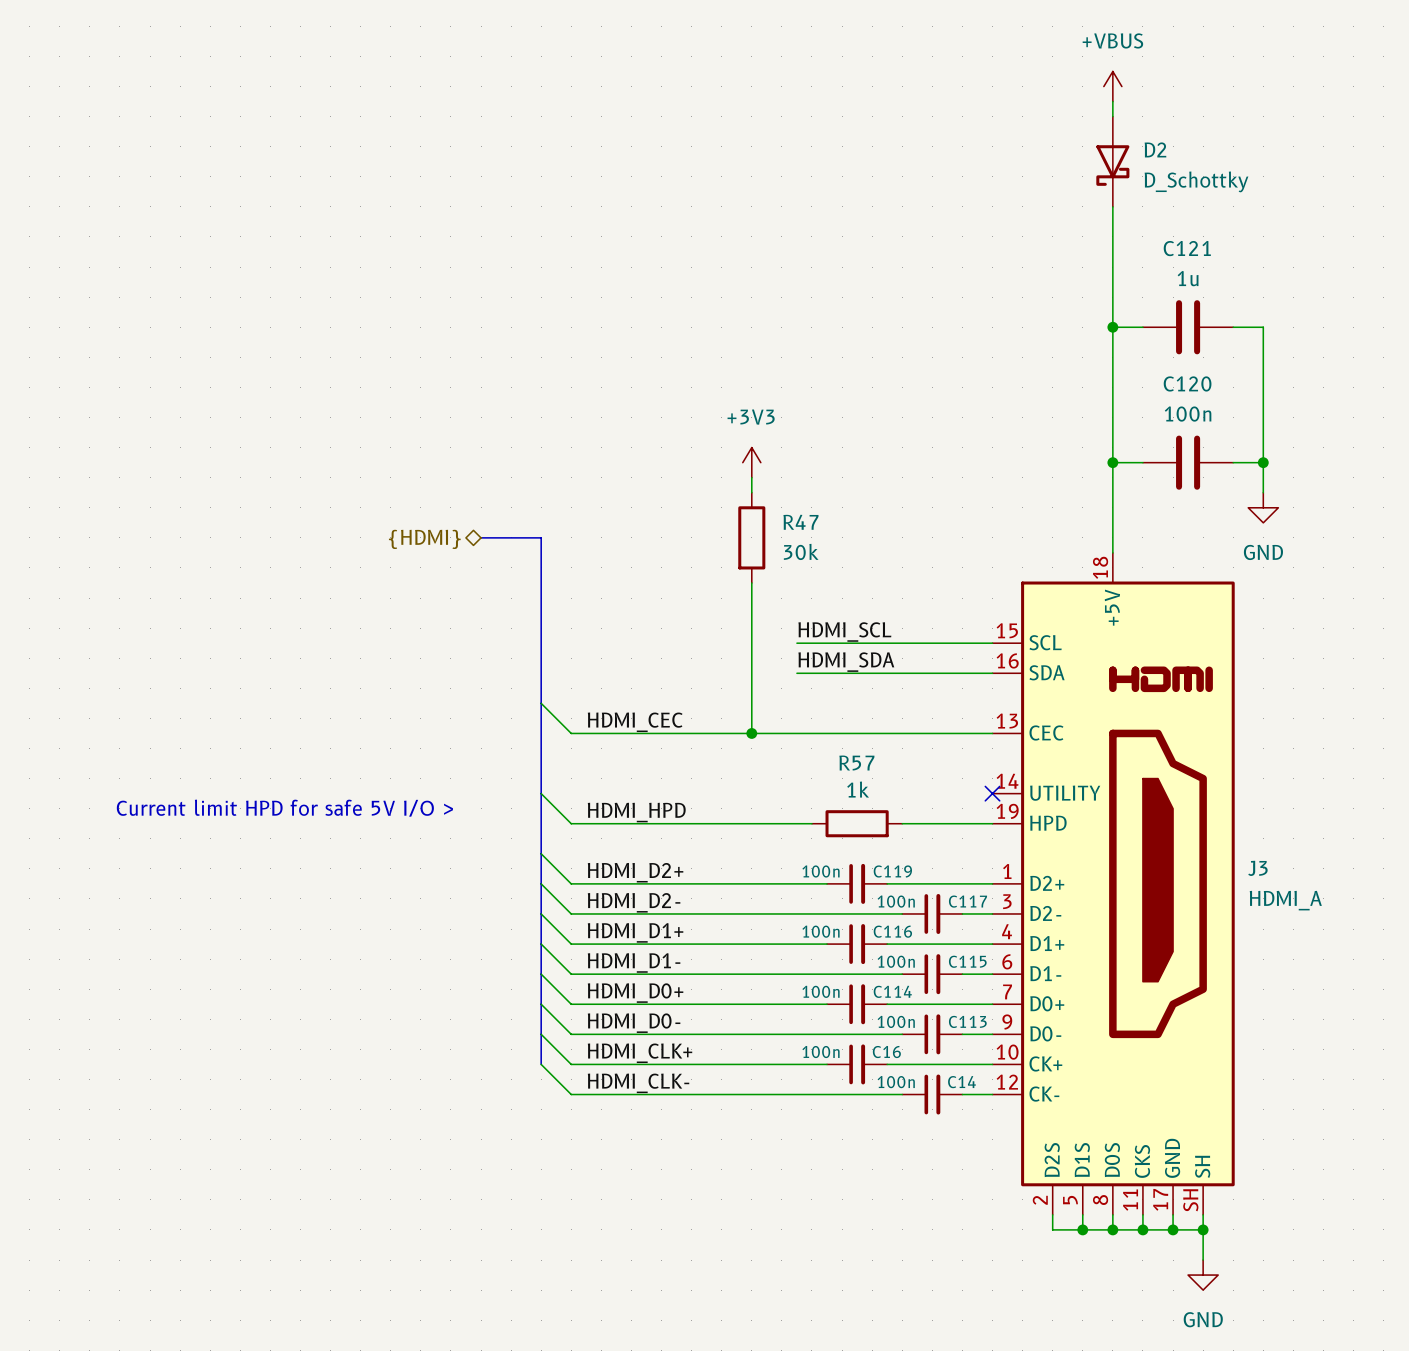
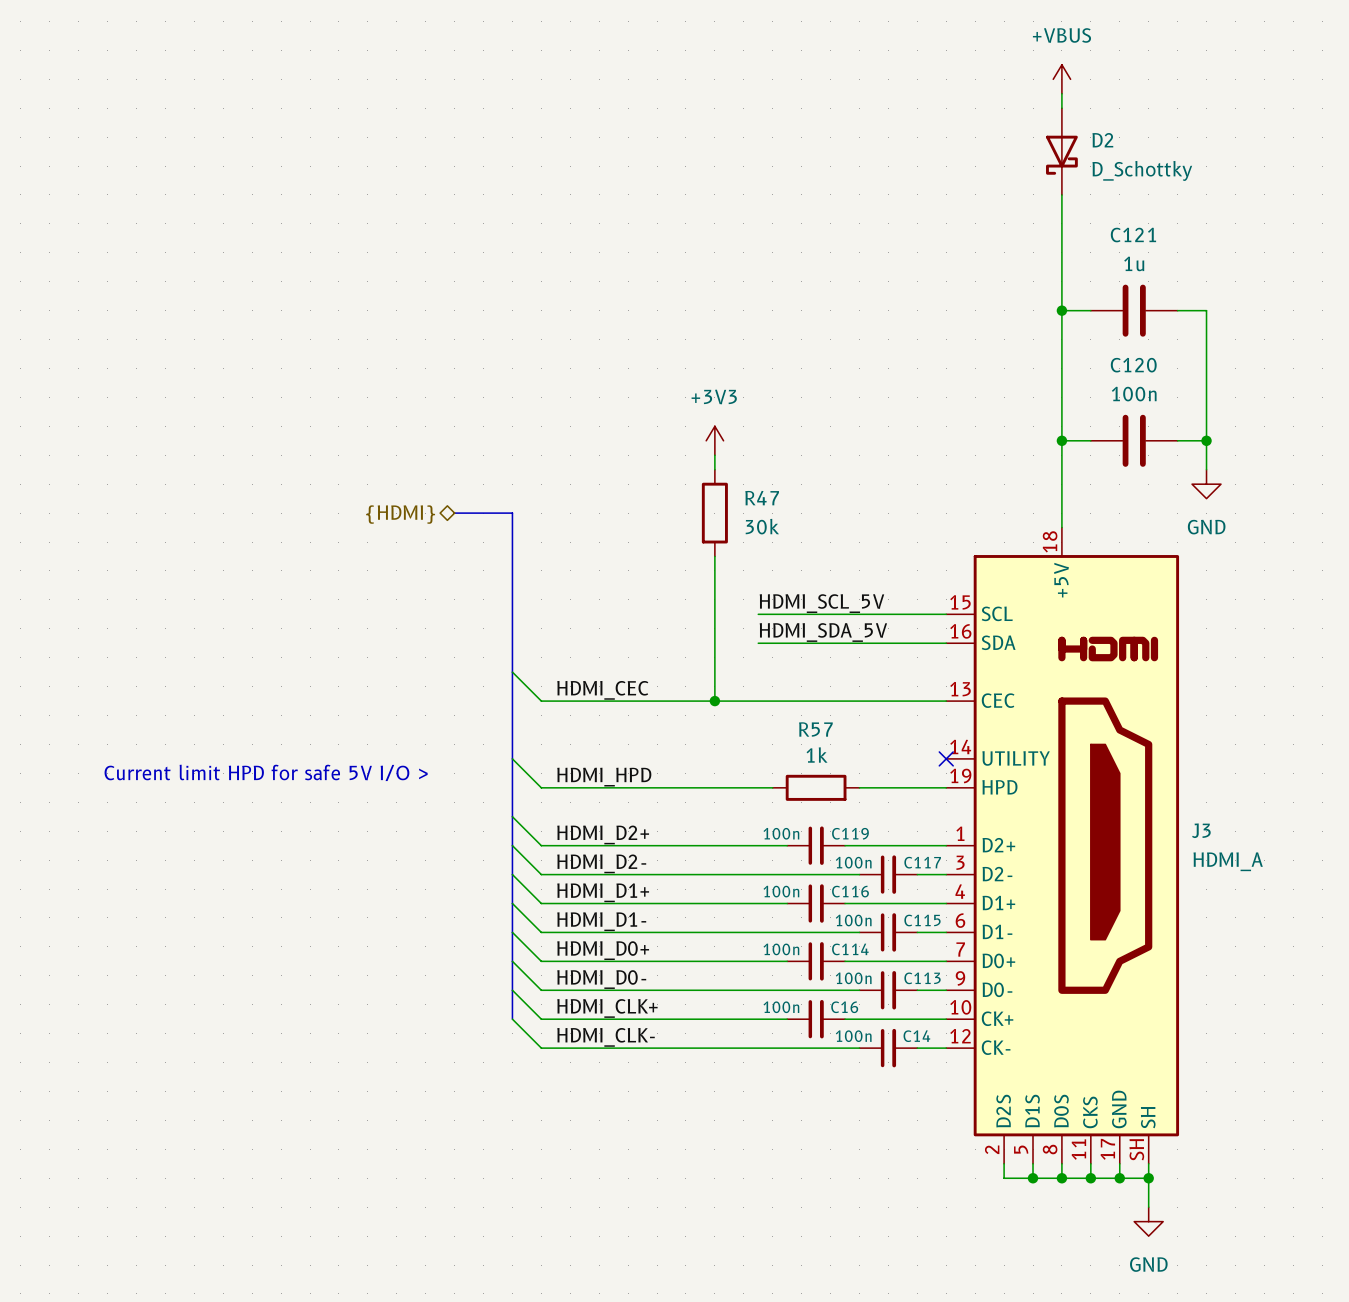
label: HDMI_SCL (844, 632) -> HDMI_SCL_5V (821, 603)
label: HDMI_SDA (846, 662) -> HDMI_SDA_5V (823, 632)

